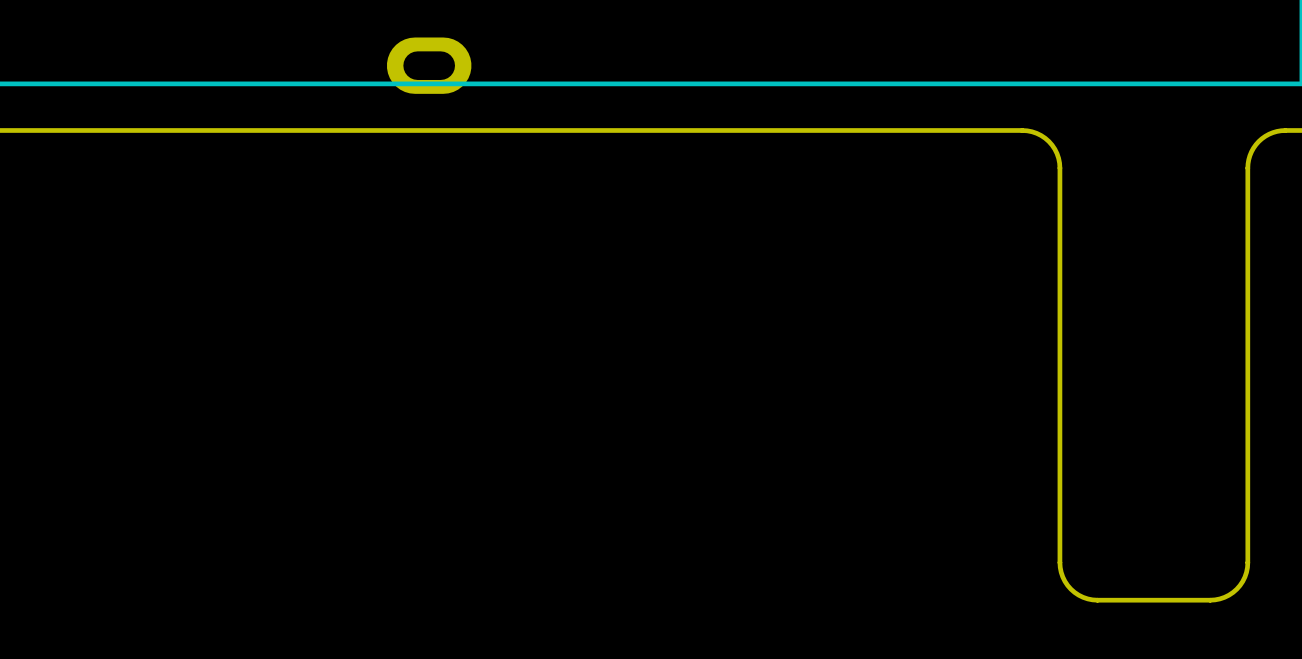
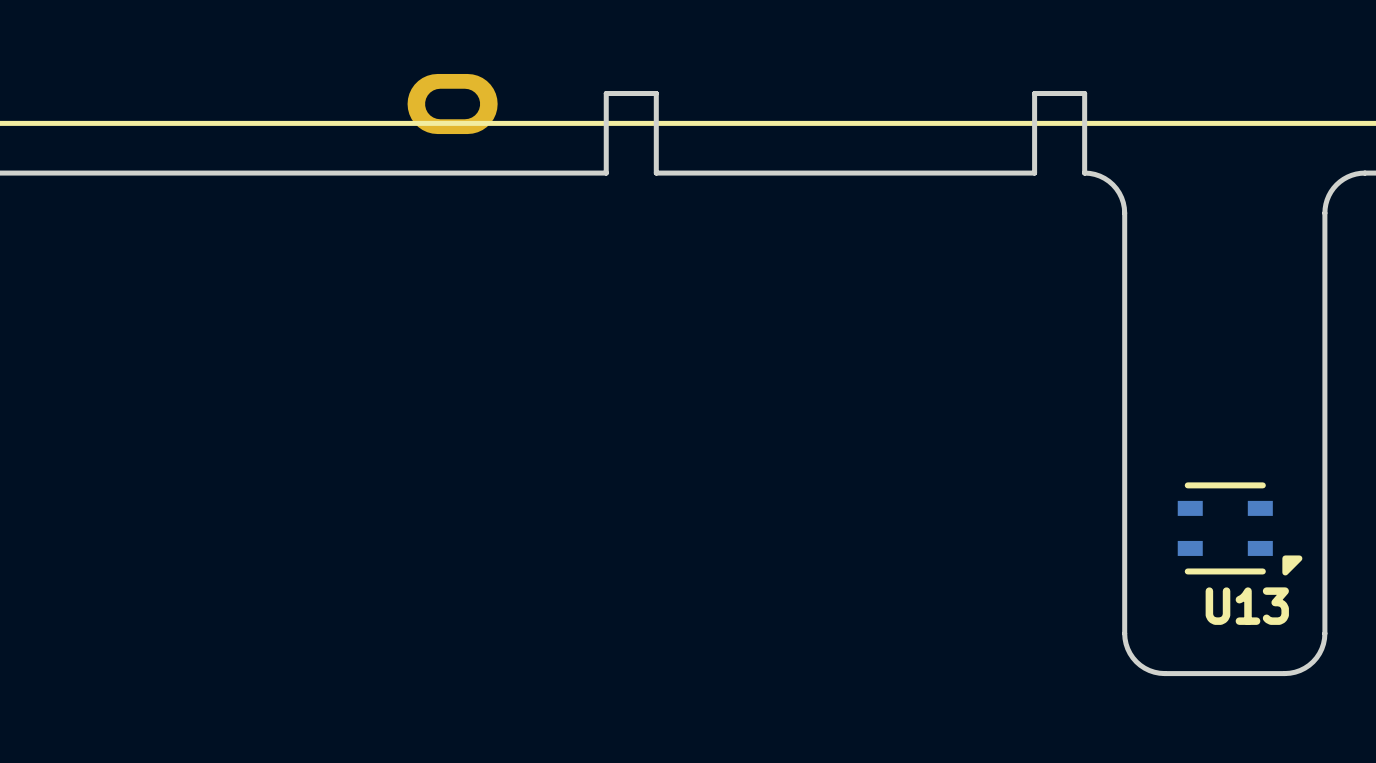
board edge: (620, 130) (573, 130) -> (656, 173) (656, 93) (606, 93) (606, 173)
board edge: (1022, 130) (975, 130) -> (1084, 173) (1084, 93) (1034, 93) (1034, 173)
U13: none -> (1240, 528)

